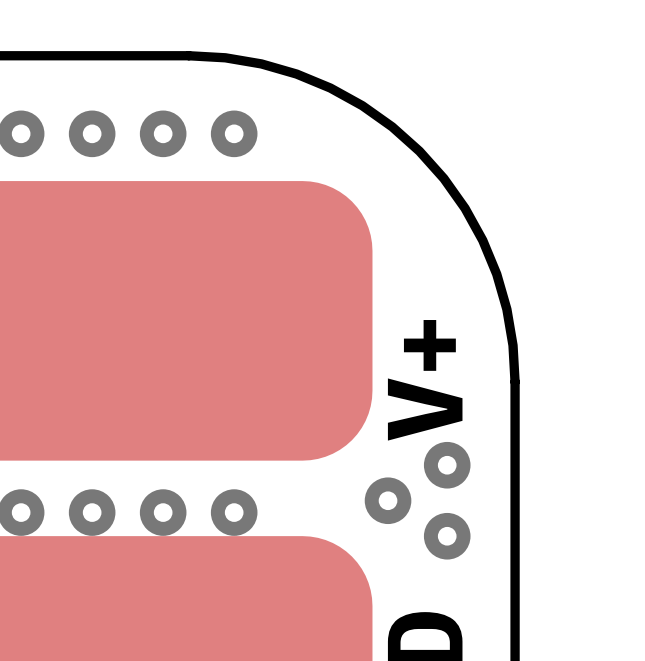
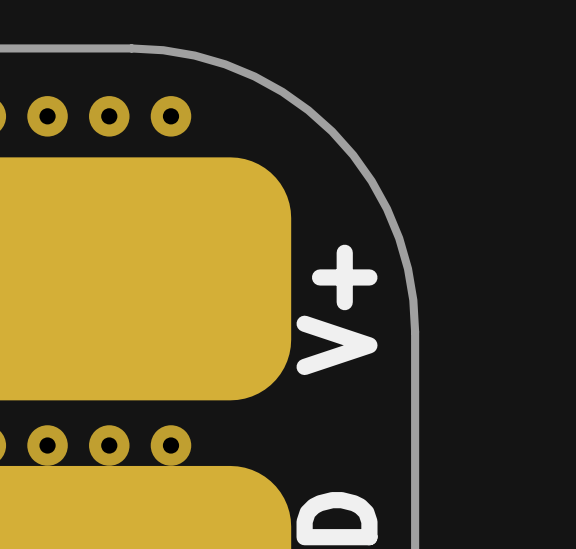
via: (447, 465) -> none
via: (388, 500) -> none
via: (447, 536) -> none

